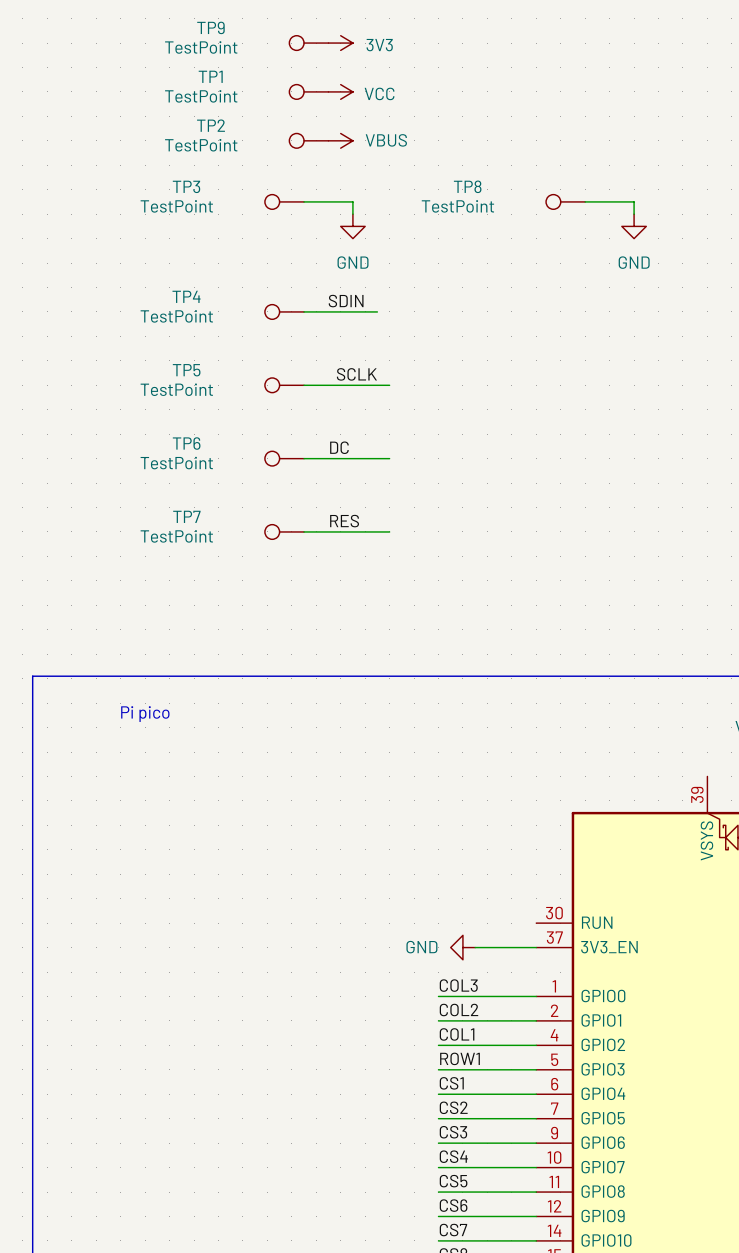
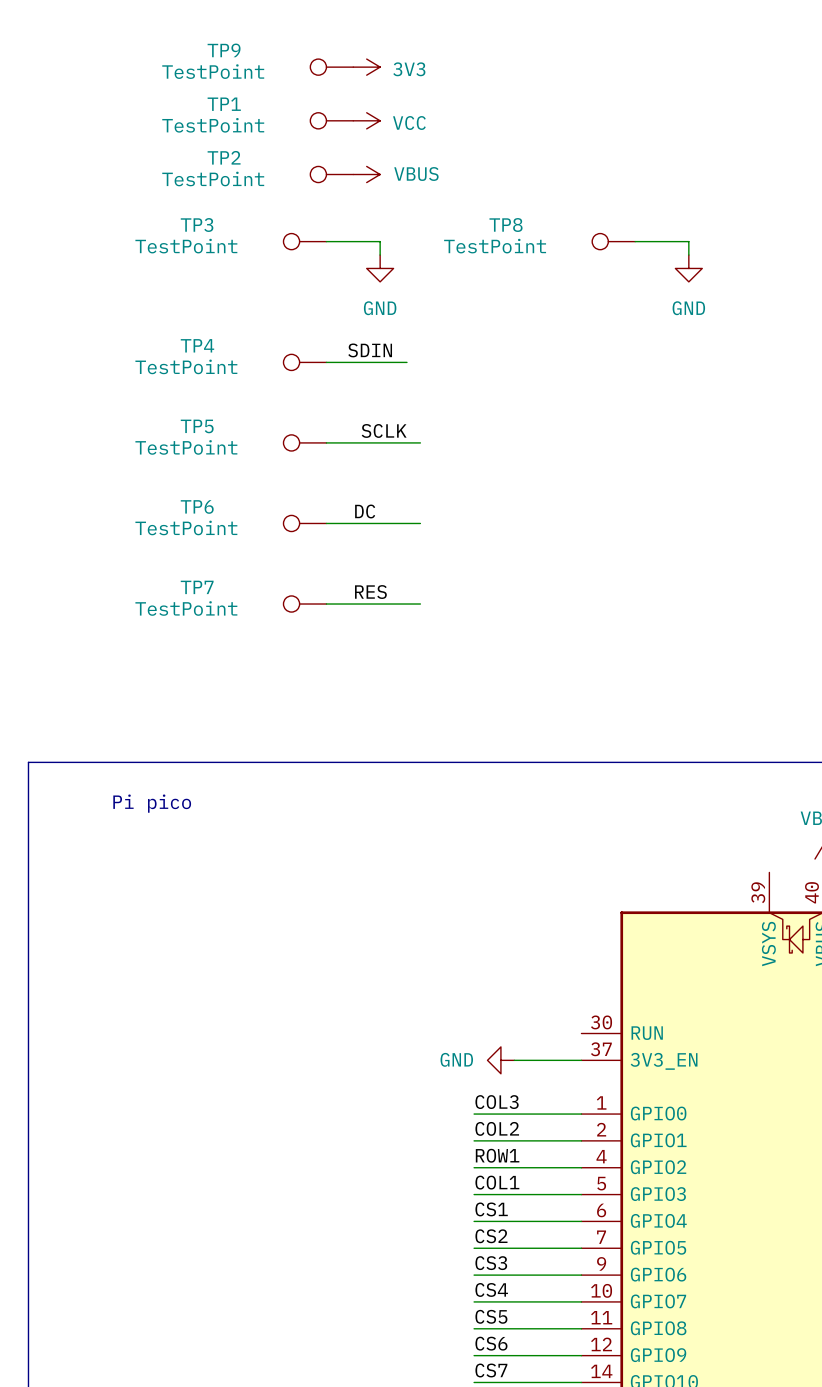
label: COL1 (457, 1034) -> ROW1 (497, 1155)
label: ROW1 (460, 1058) -> COL1 (497, 1182)

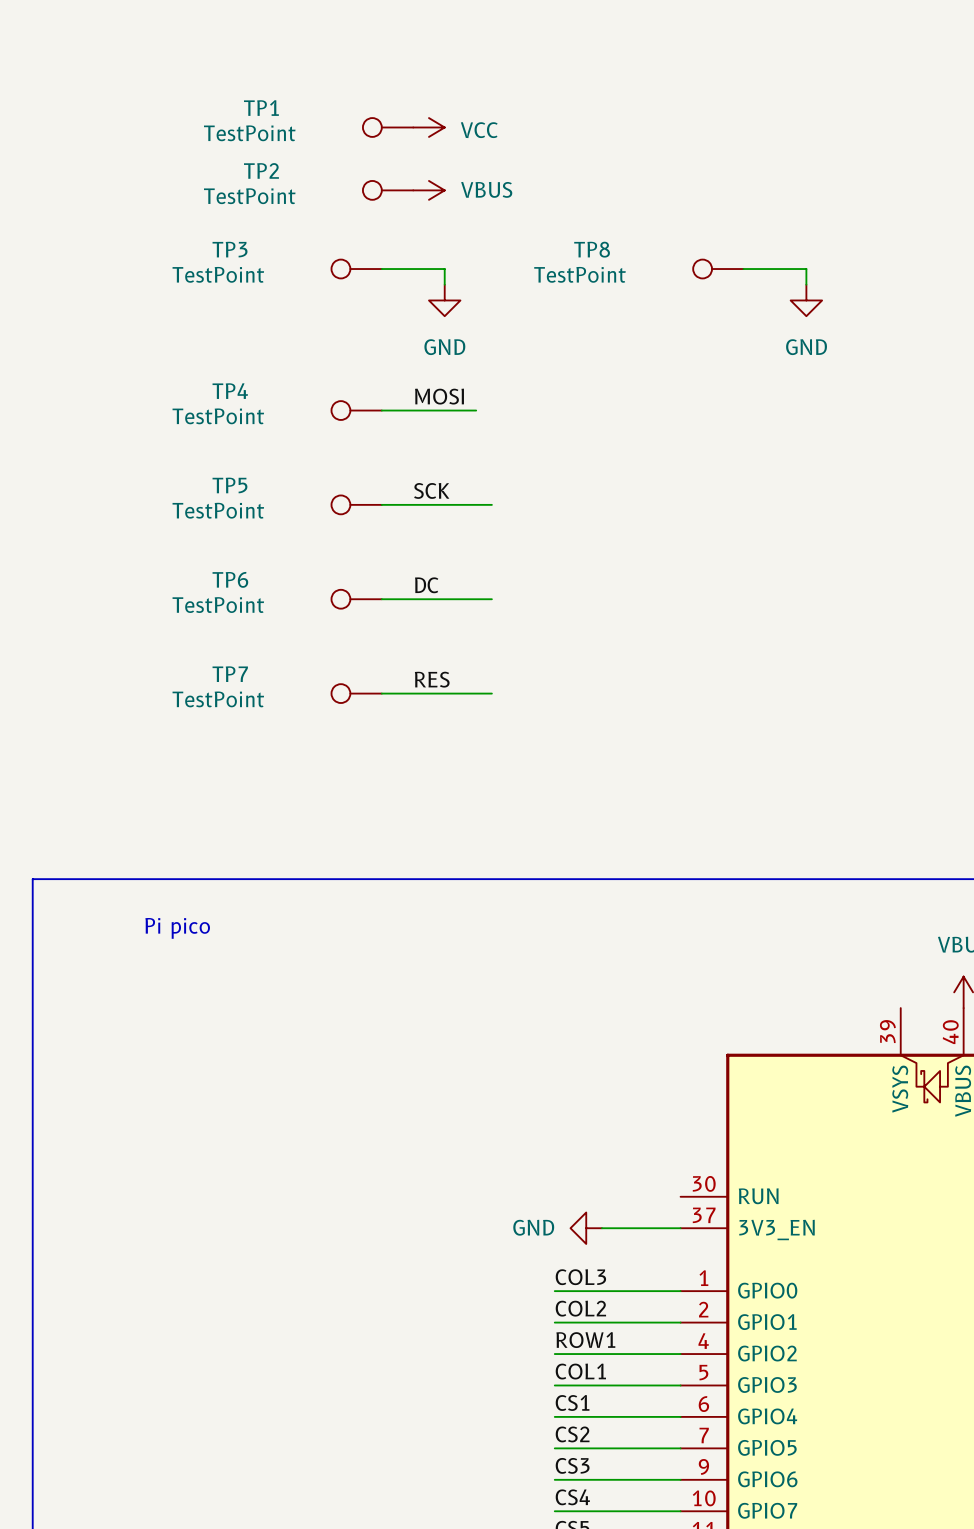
TP9: TestPoint (331, 67) -> none
power symbol: 3V3 (366, 67) -> none
label: SDIN (370, 350) -> none
label: none -> MOSI (439, 396)
label: SCLK (384, 430) -> SCK (431, 490)

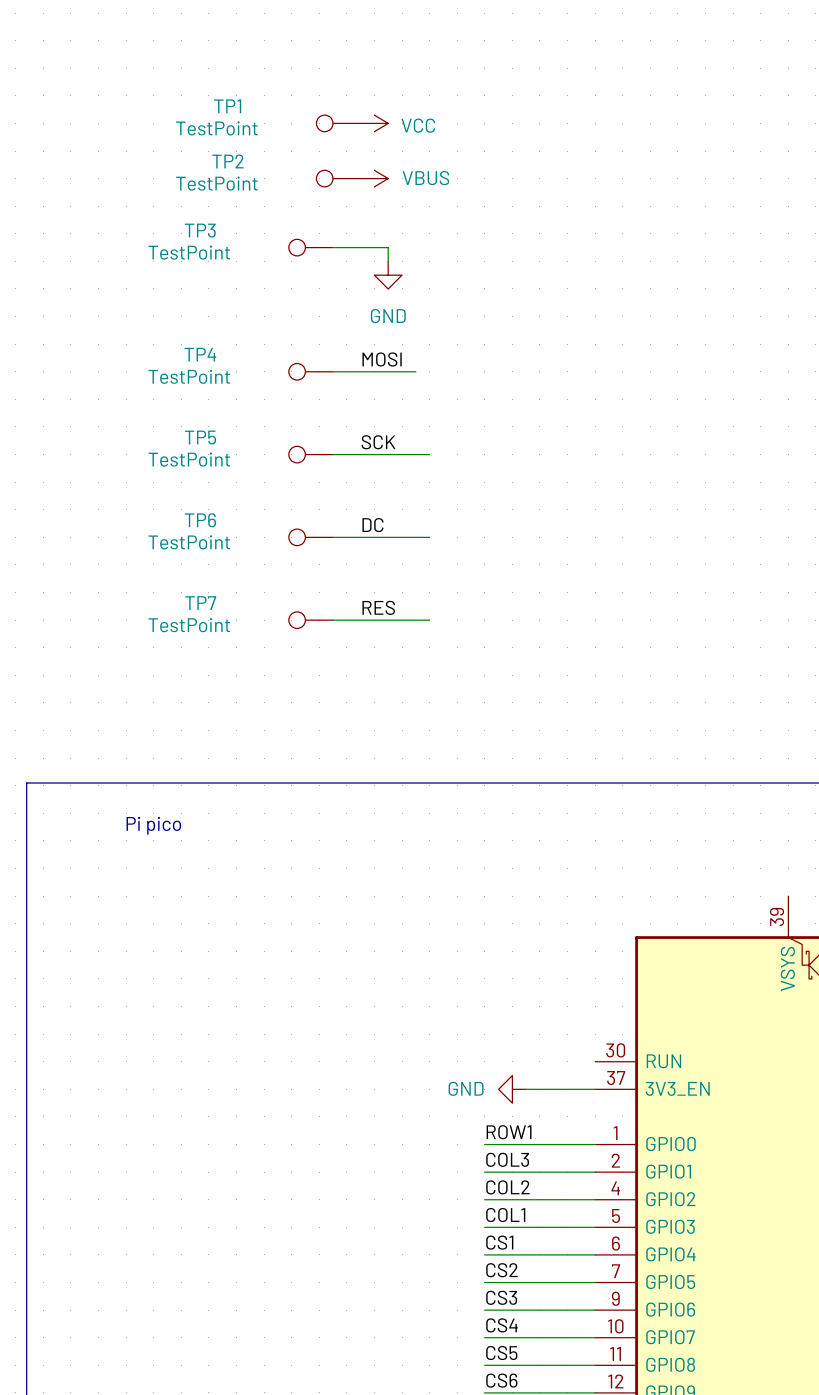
TP8: TestPoint (718, 269) -> none
wire: (743, 269) (806, 269) (806, 284) -> none
power symbol: GND (806, 300) -> none
label: COL3 (580, 1277) -> ROW1 (509, 1132)
label: COL2 (580, 1308) -> COL3 (507, 1159)
label: ROW1 (585, 1340) -> COL2 (507, 1187)

